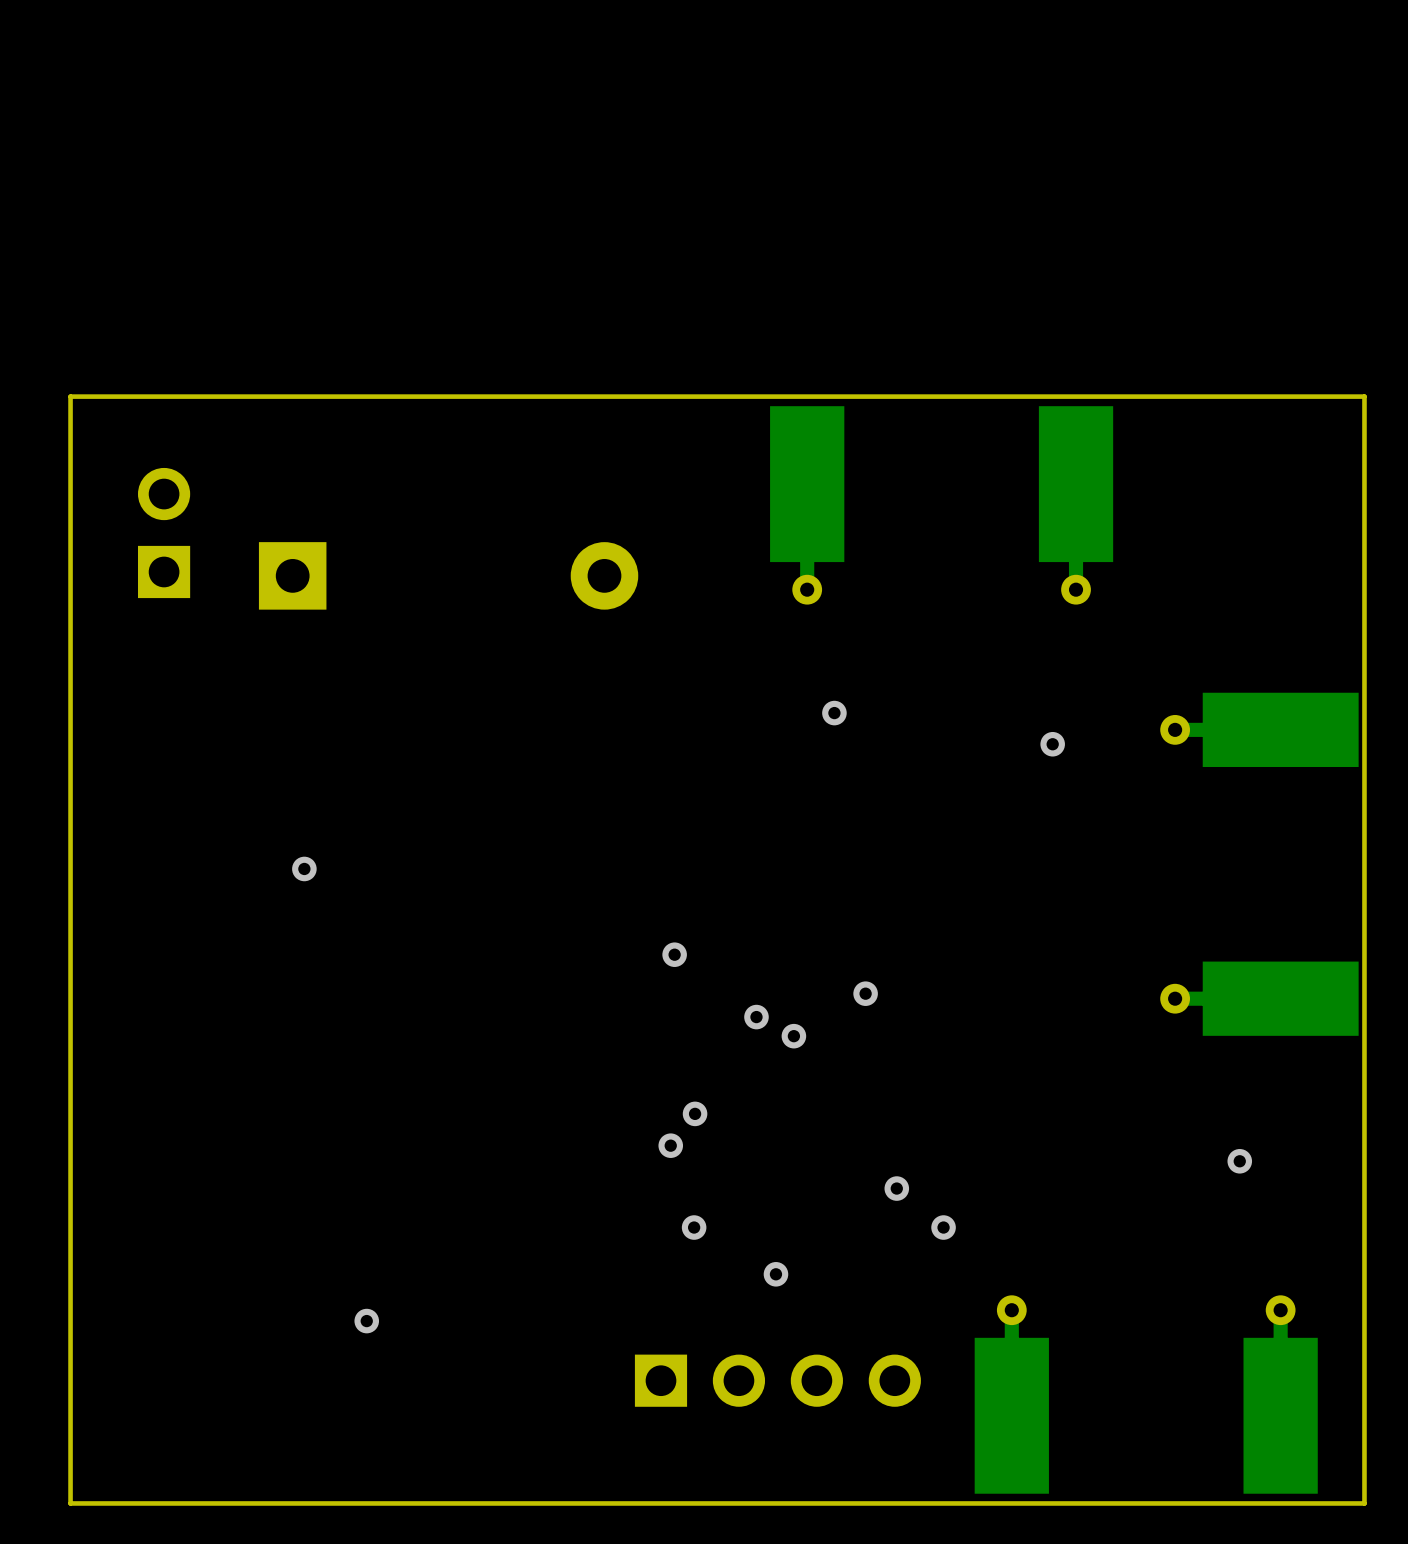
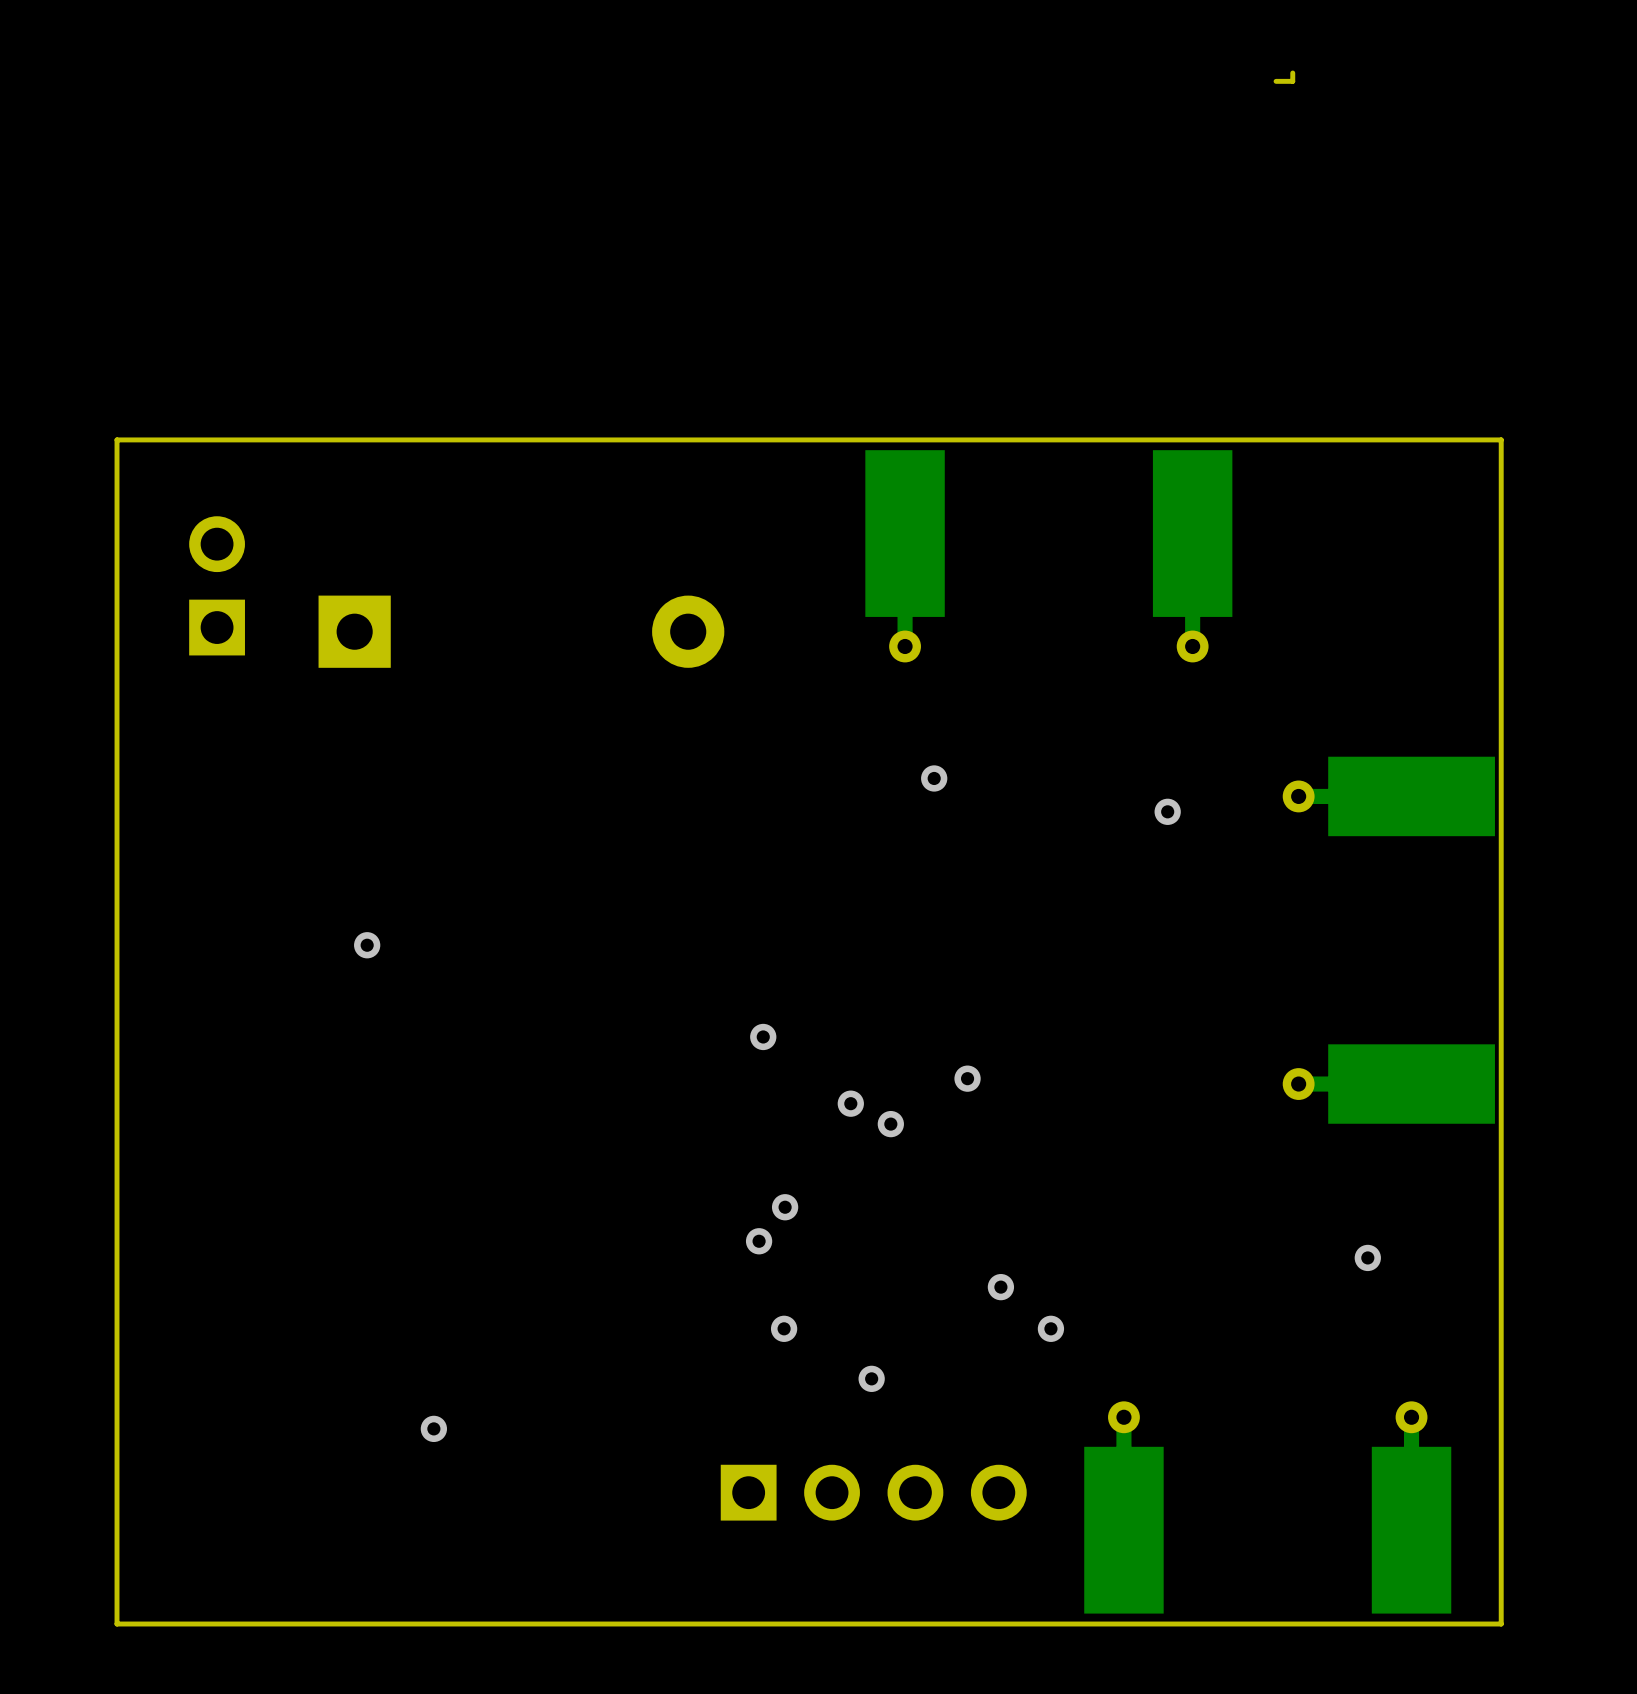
board edge: none -> (1292, 73) (1292, 81) (1276, 81)

